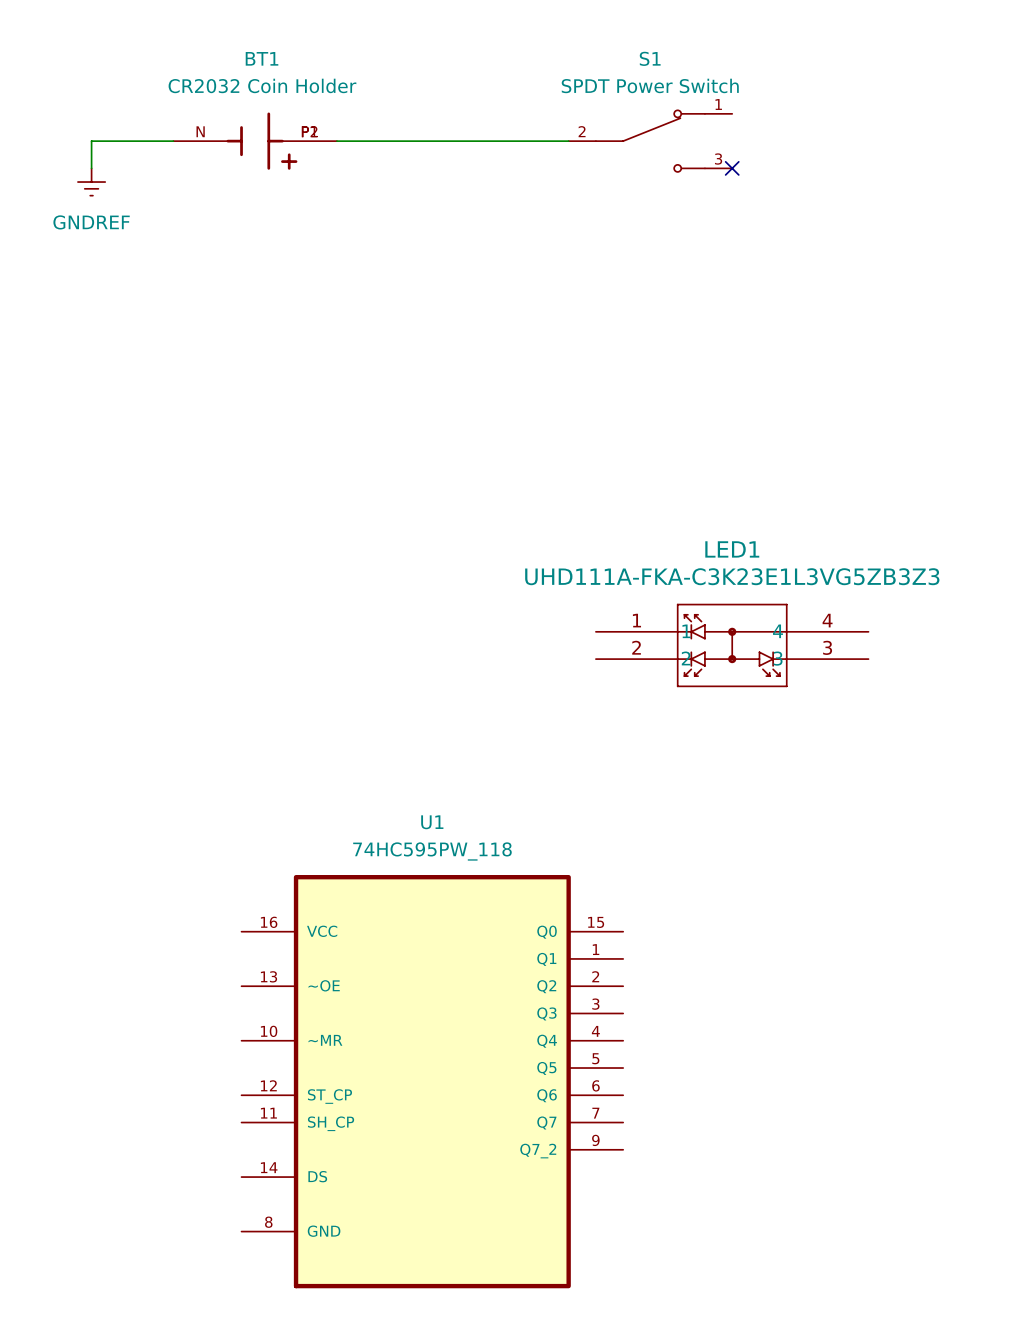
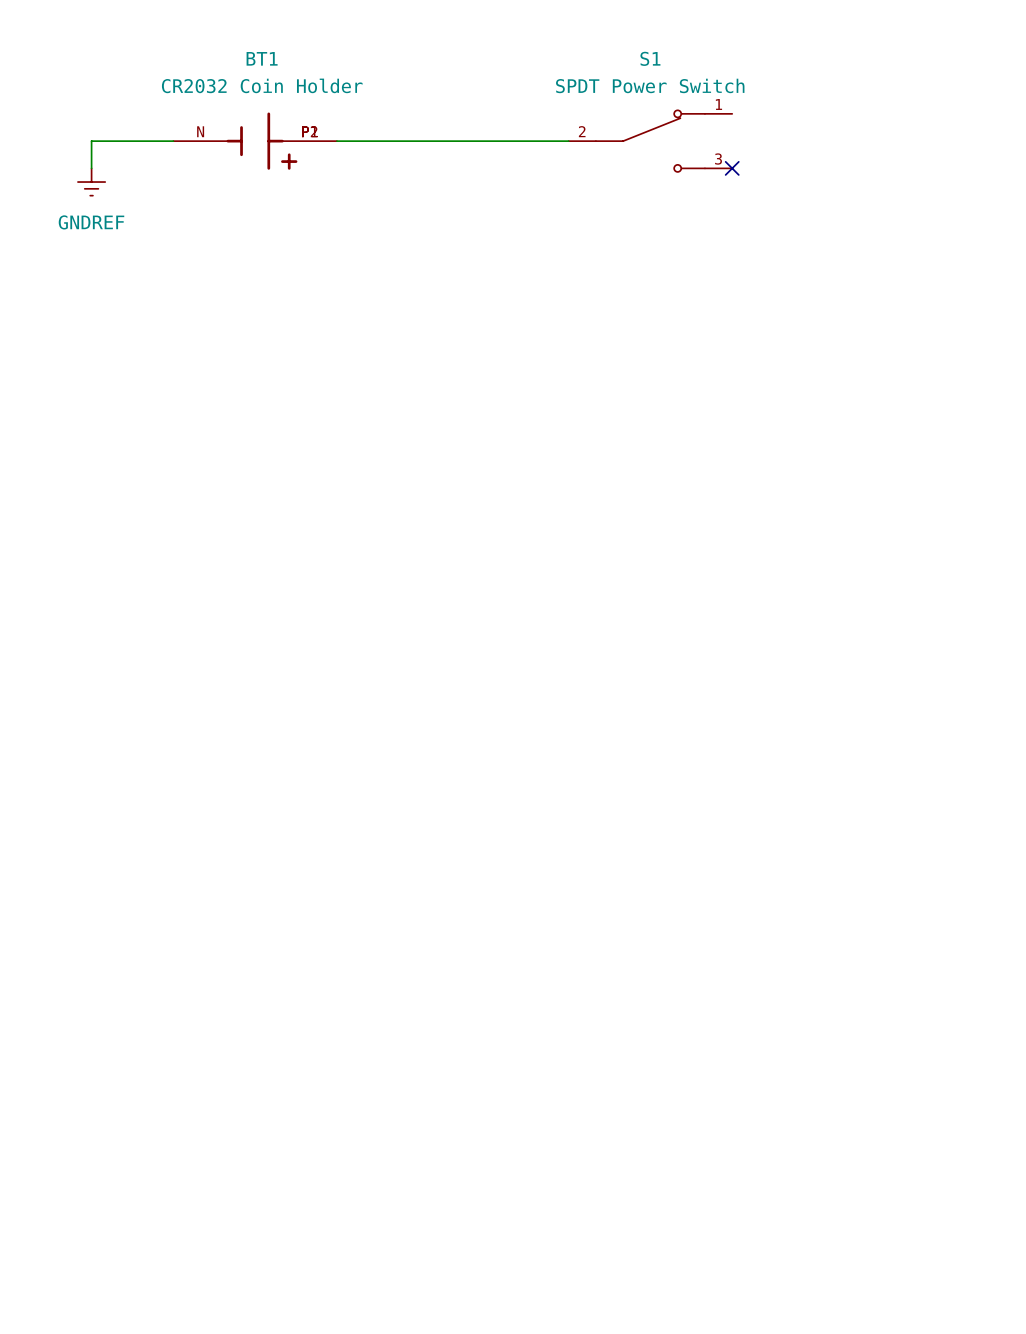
LED1: UHD111A-FKA-C3K23E1L3VG5ZB3Z3 (732, 645) -> none
U1: 74HC595PW_118 (432, 1081) -> none

